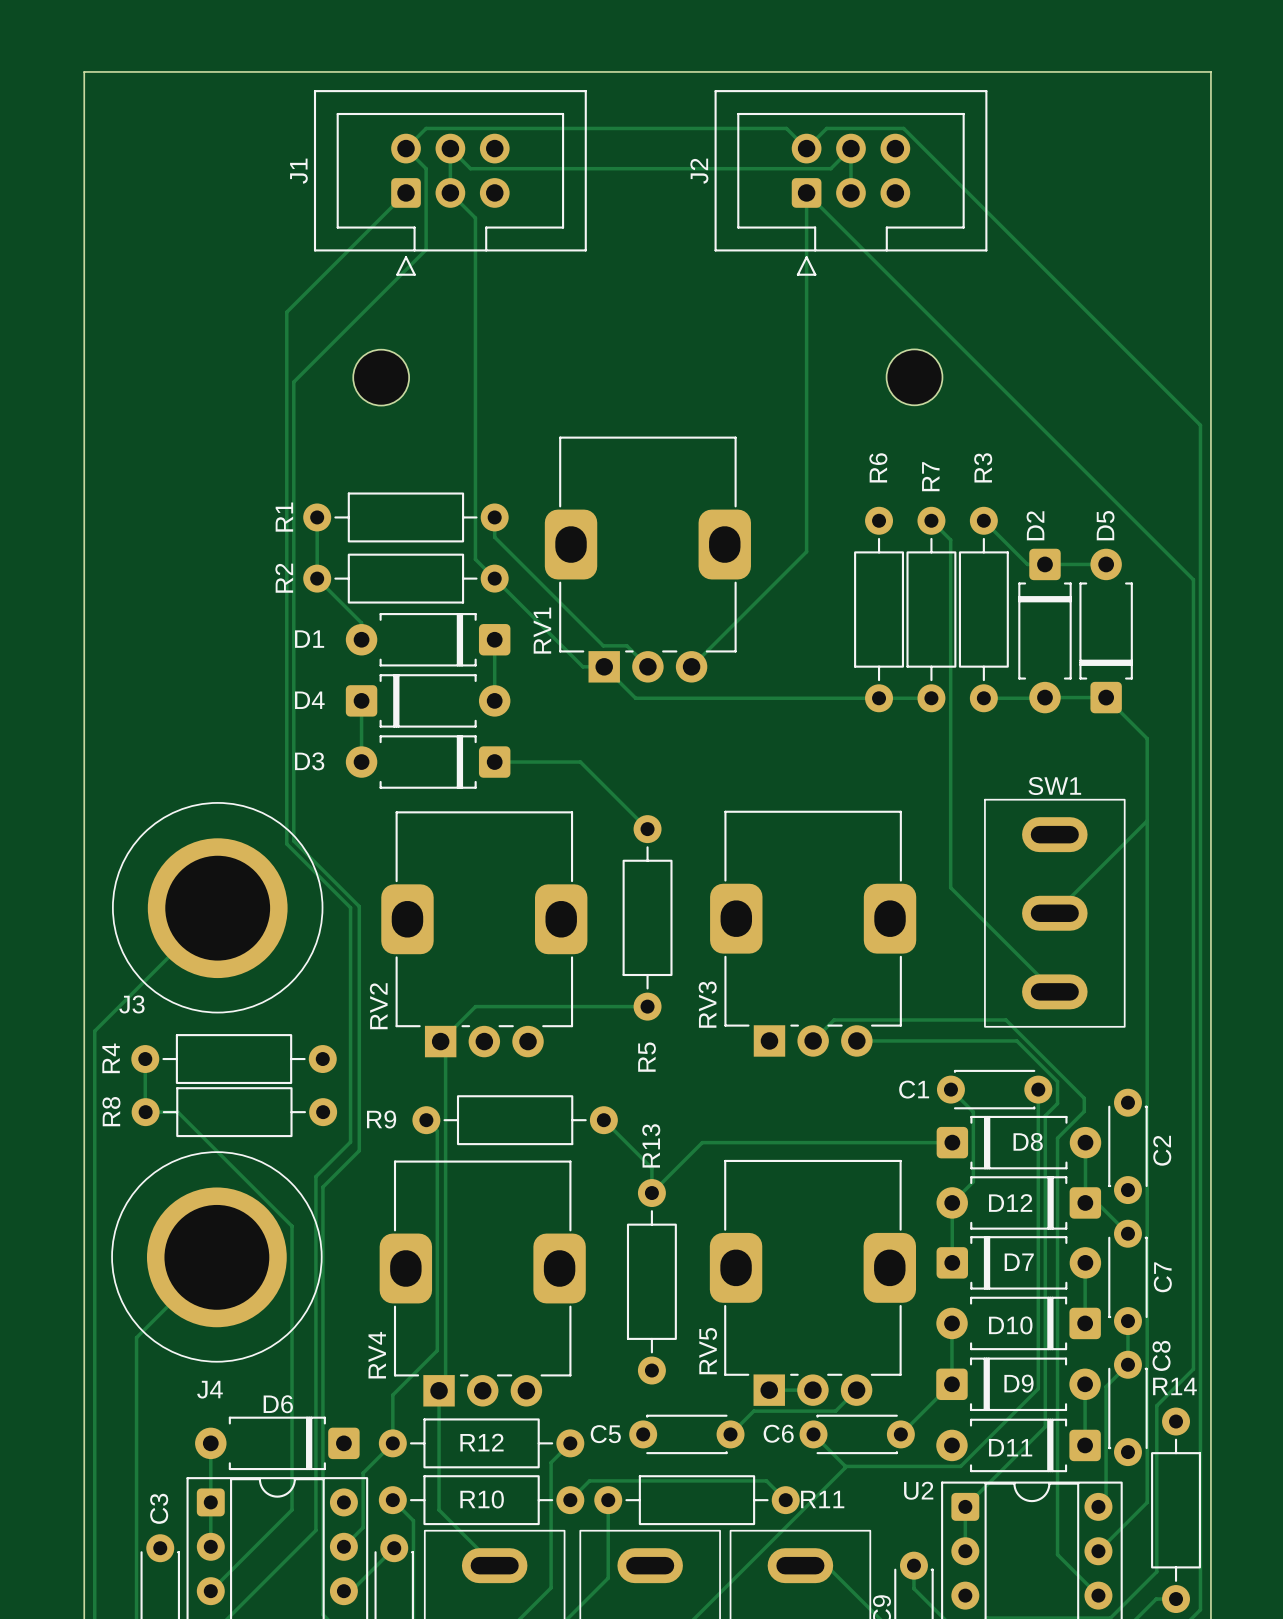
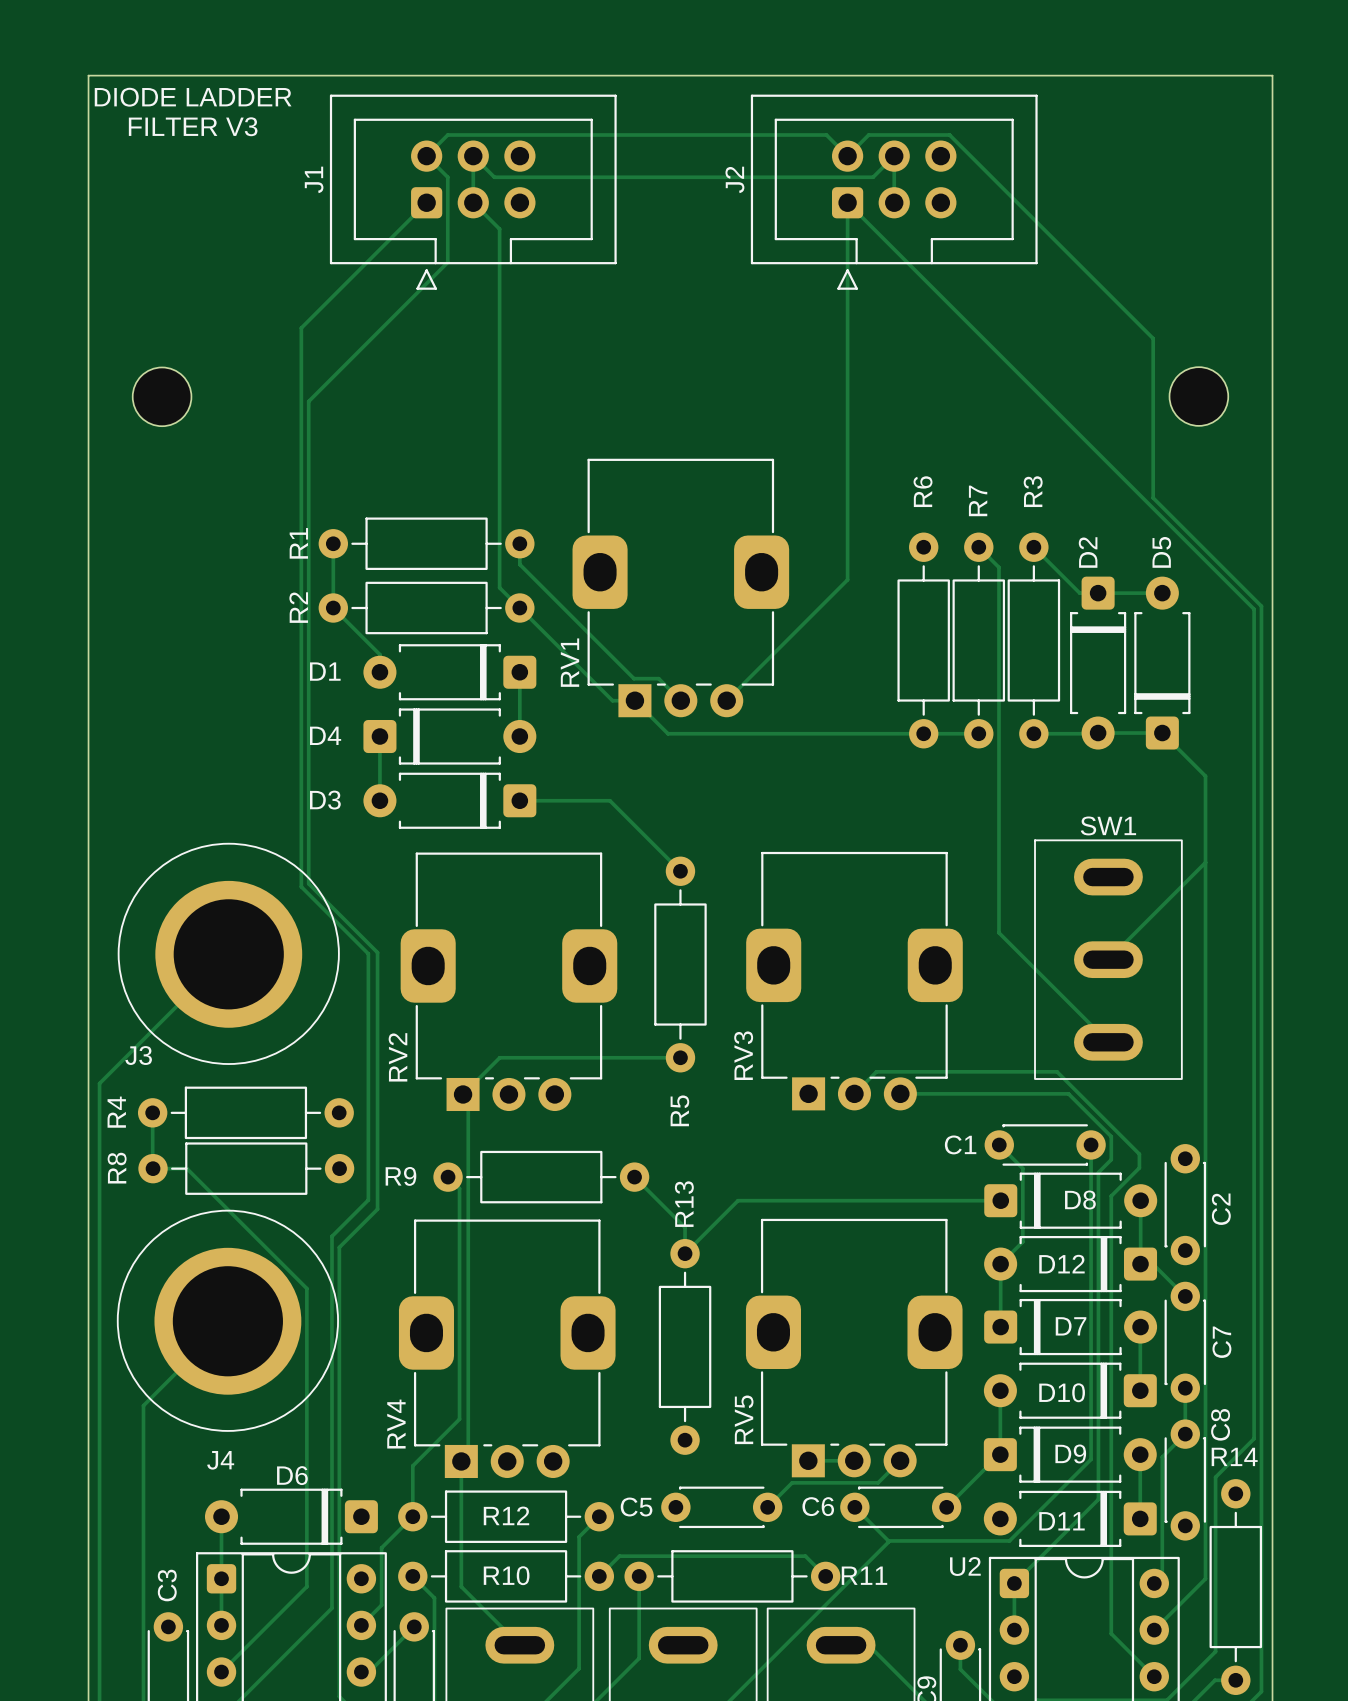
text: none -> DIODE LADDER (193, 97)
text: none -> FILTER V3 (193, 126)
track: (1097, 322) (1200, 425) (1200, 576) -> (1153, 338) (1153, 497) (1261, 606)
part position: (381, 377) -> (162, 396)
part position: (914, 377) -> (1198, 396)

